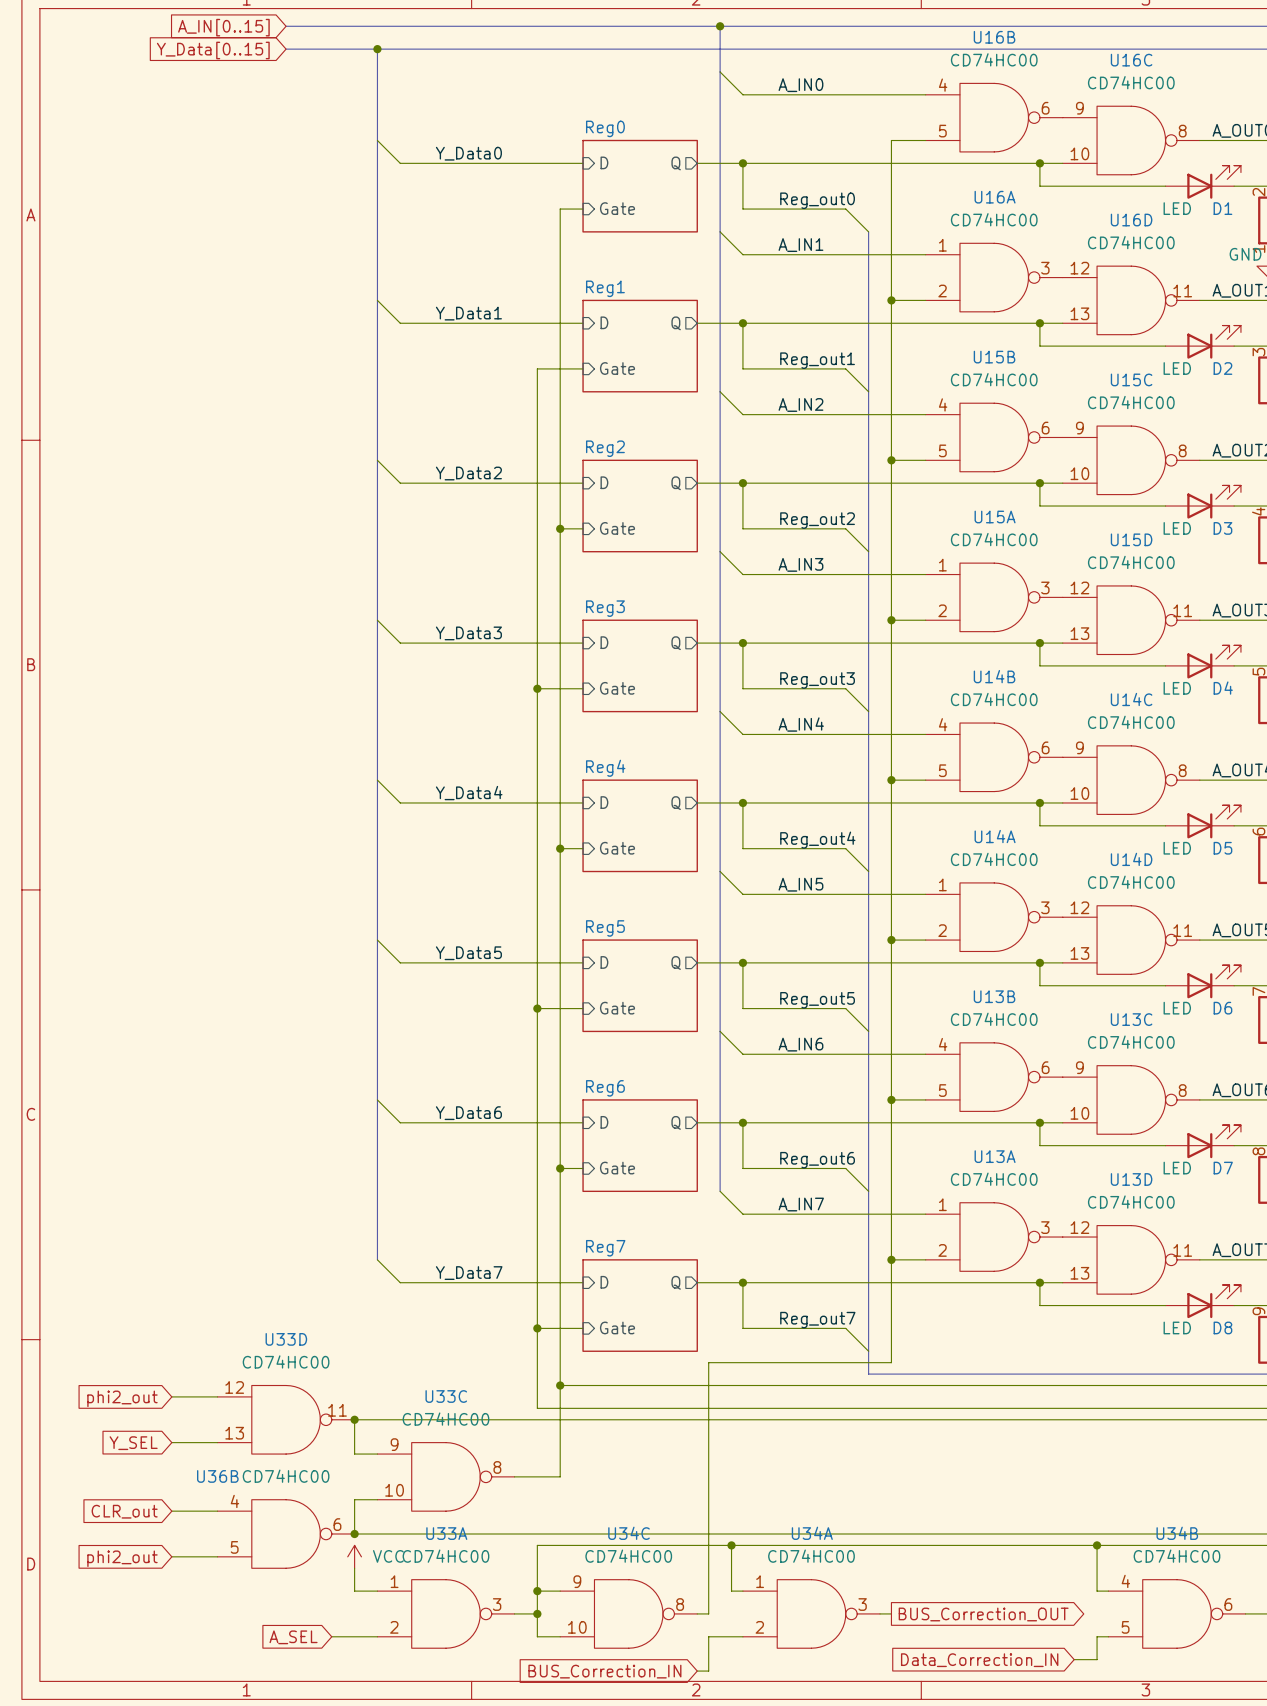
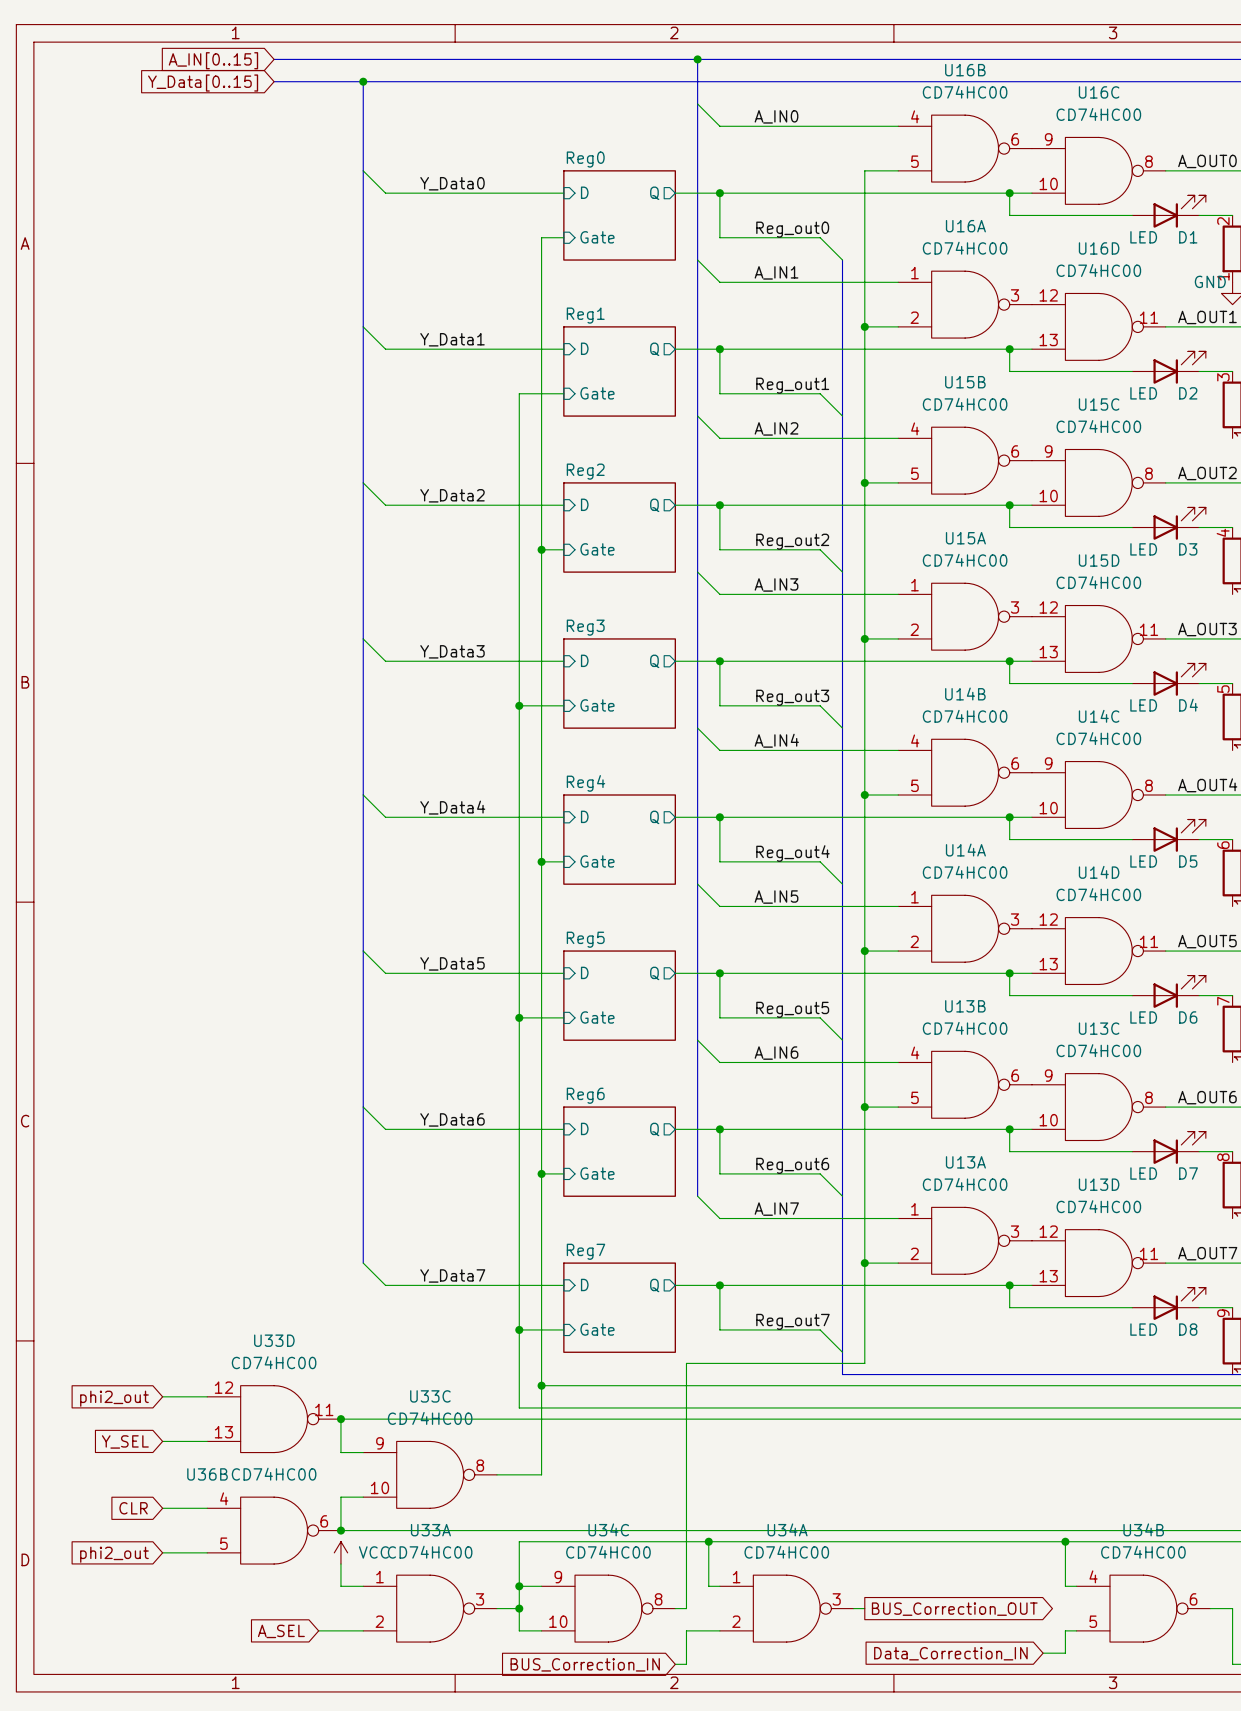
global label: CLR_out (124, 1511) -> CLR (133, 1508)

